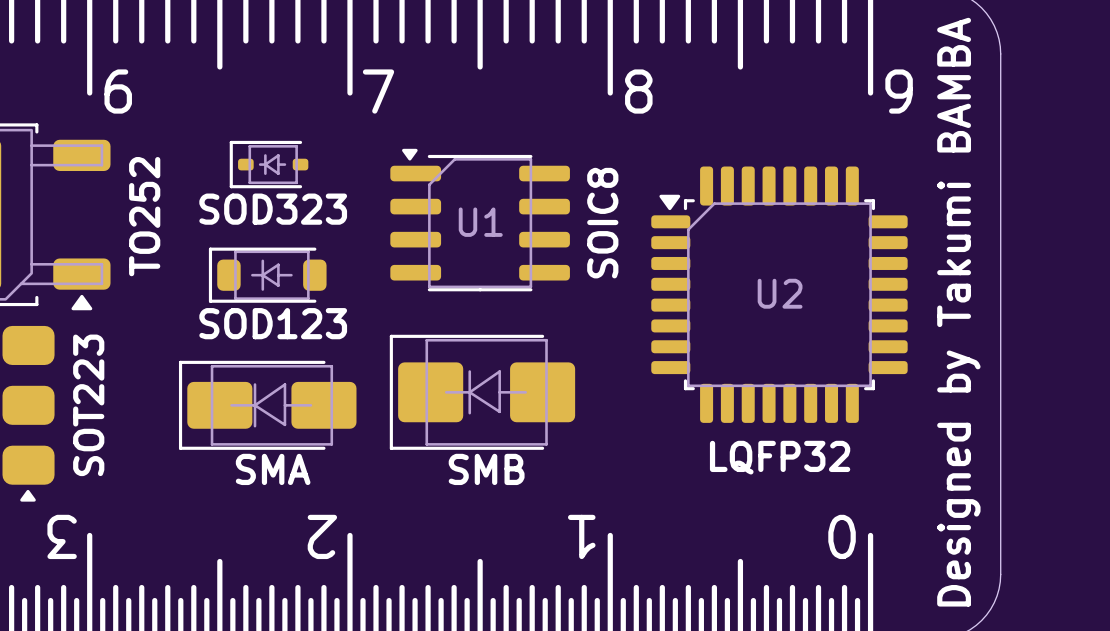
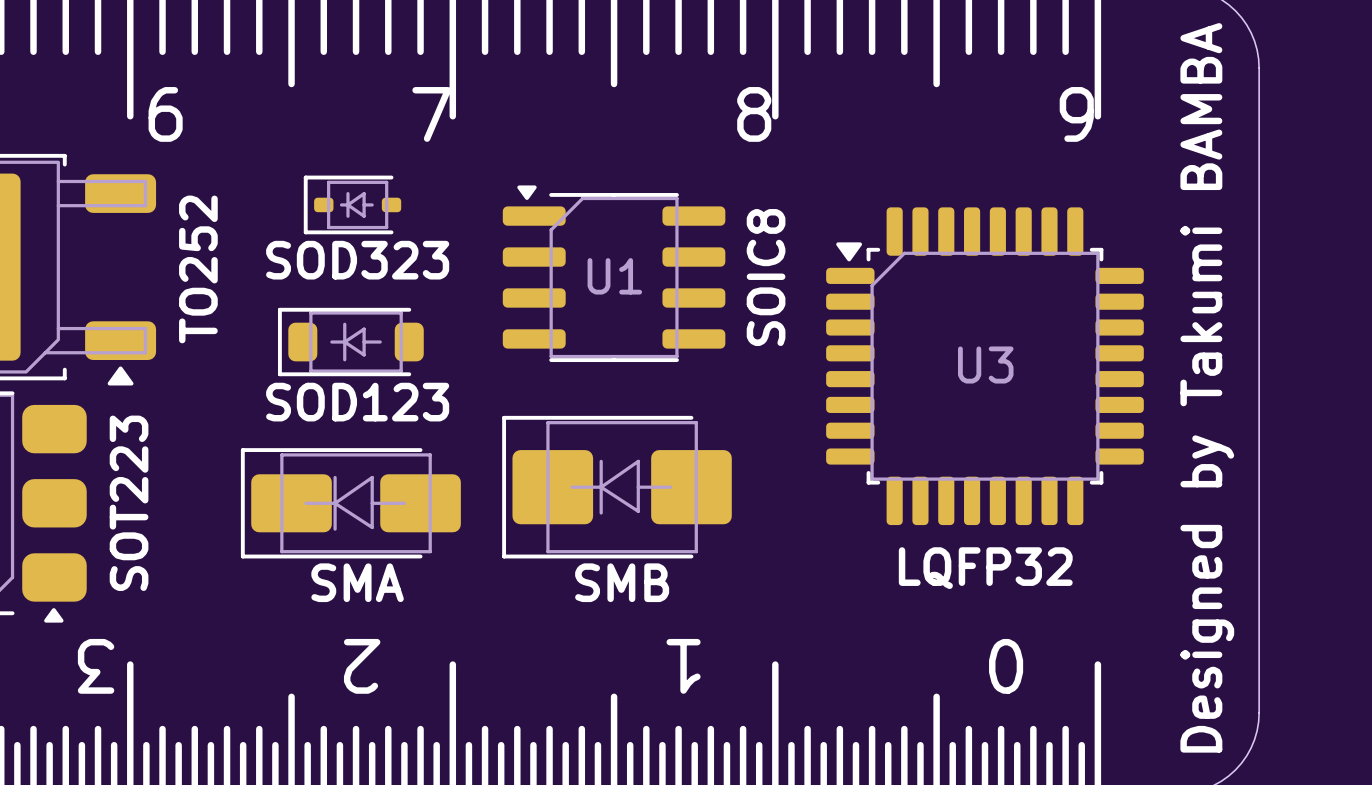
text position: 7 (378, 91) -> 7 (431, 114)
text position: 8 (638, 91) -> 8 (754, 114)
text position: 9 (899, 91) -> 9 (1076, 114)
U2 name: U2 (780, 293) -> U3 (985, 365)
text position: 2 (322, 536) -> 2 (362, 666)
text position: 1 (581, 536) -> 1 (683, 666)
text position: 0 (842, 536) -> 0 (1006, 666)

